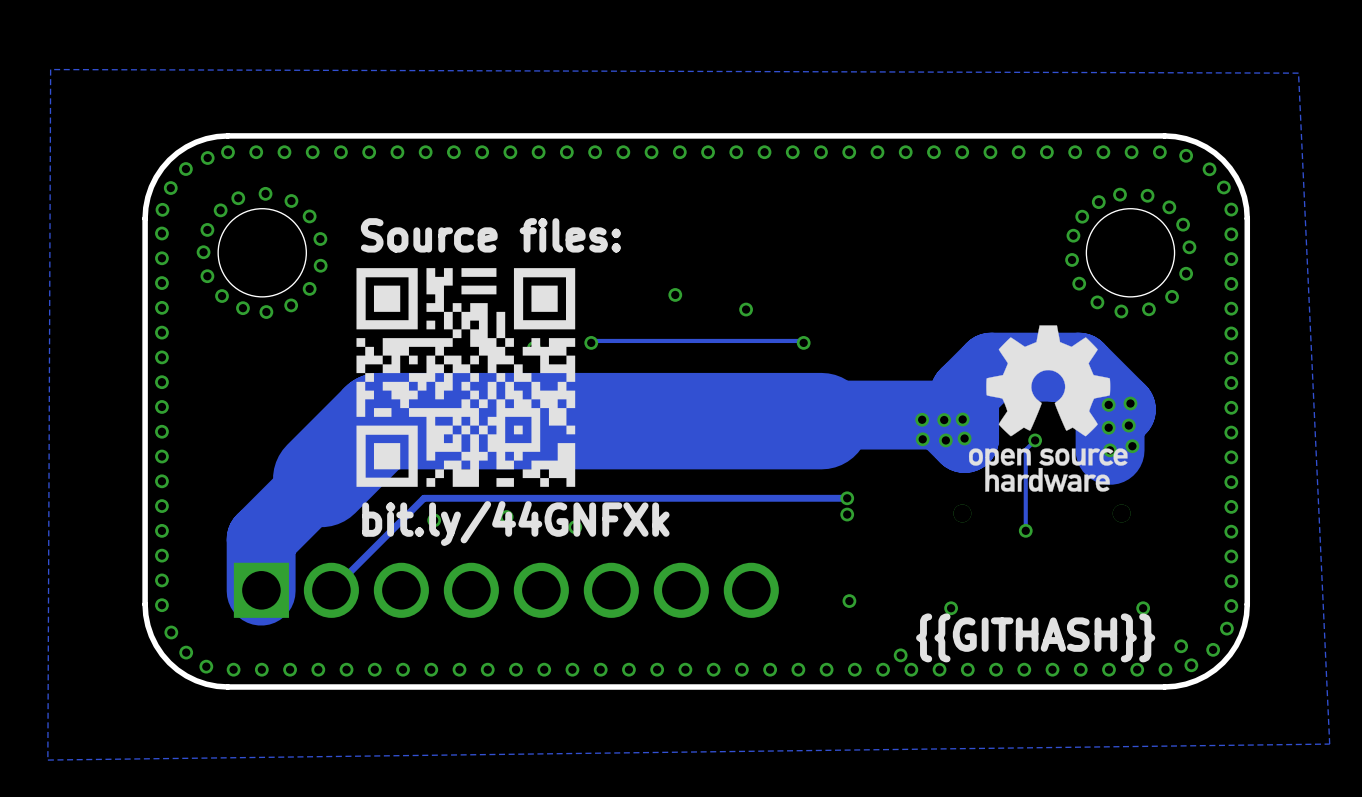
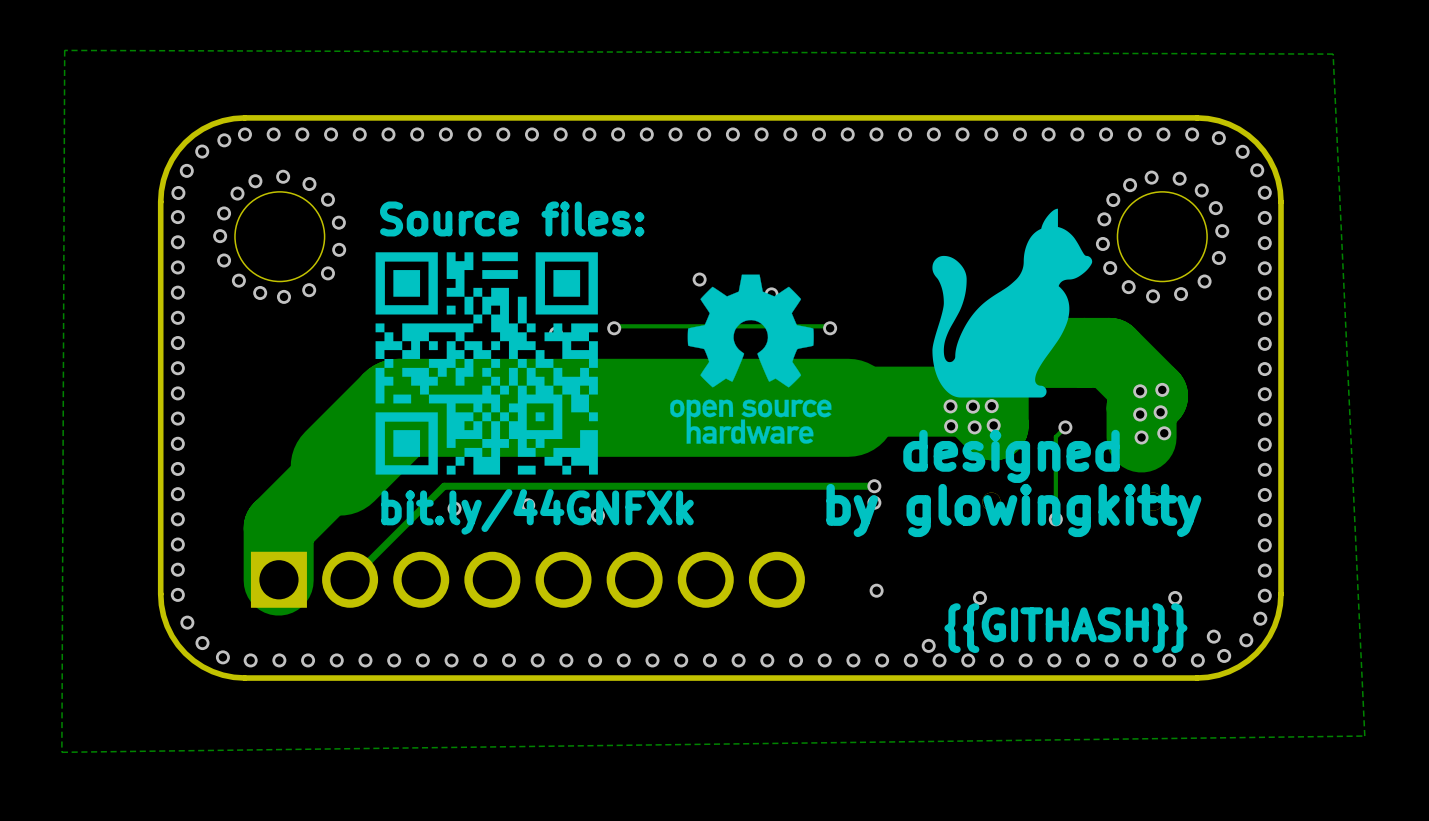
drawing: none -> [932, 208, 1093, 398]
drawing position: (1048, 408) -> (750, 359)
text: none -> designed (1011, 456)
text: none -> by glowingkitty (1013, 510)

